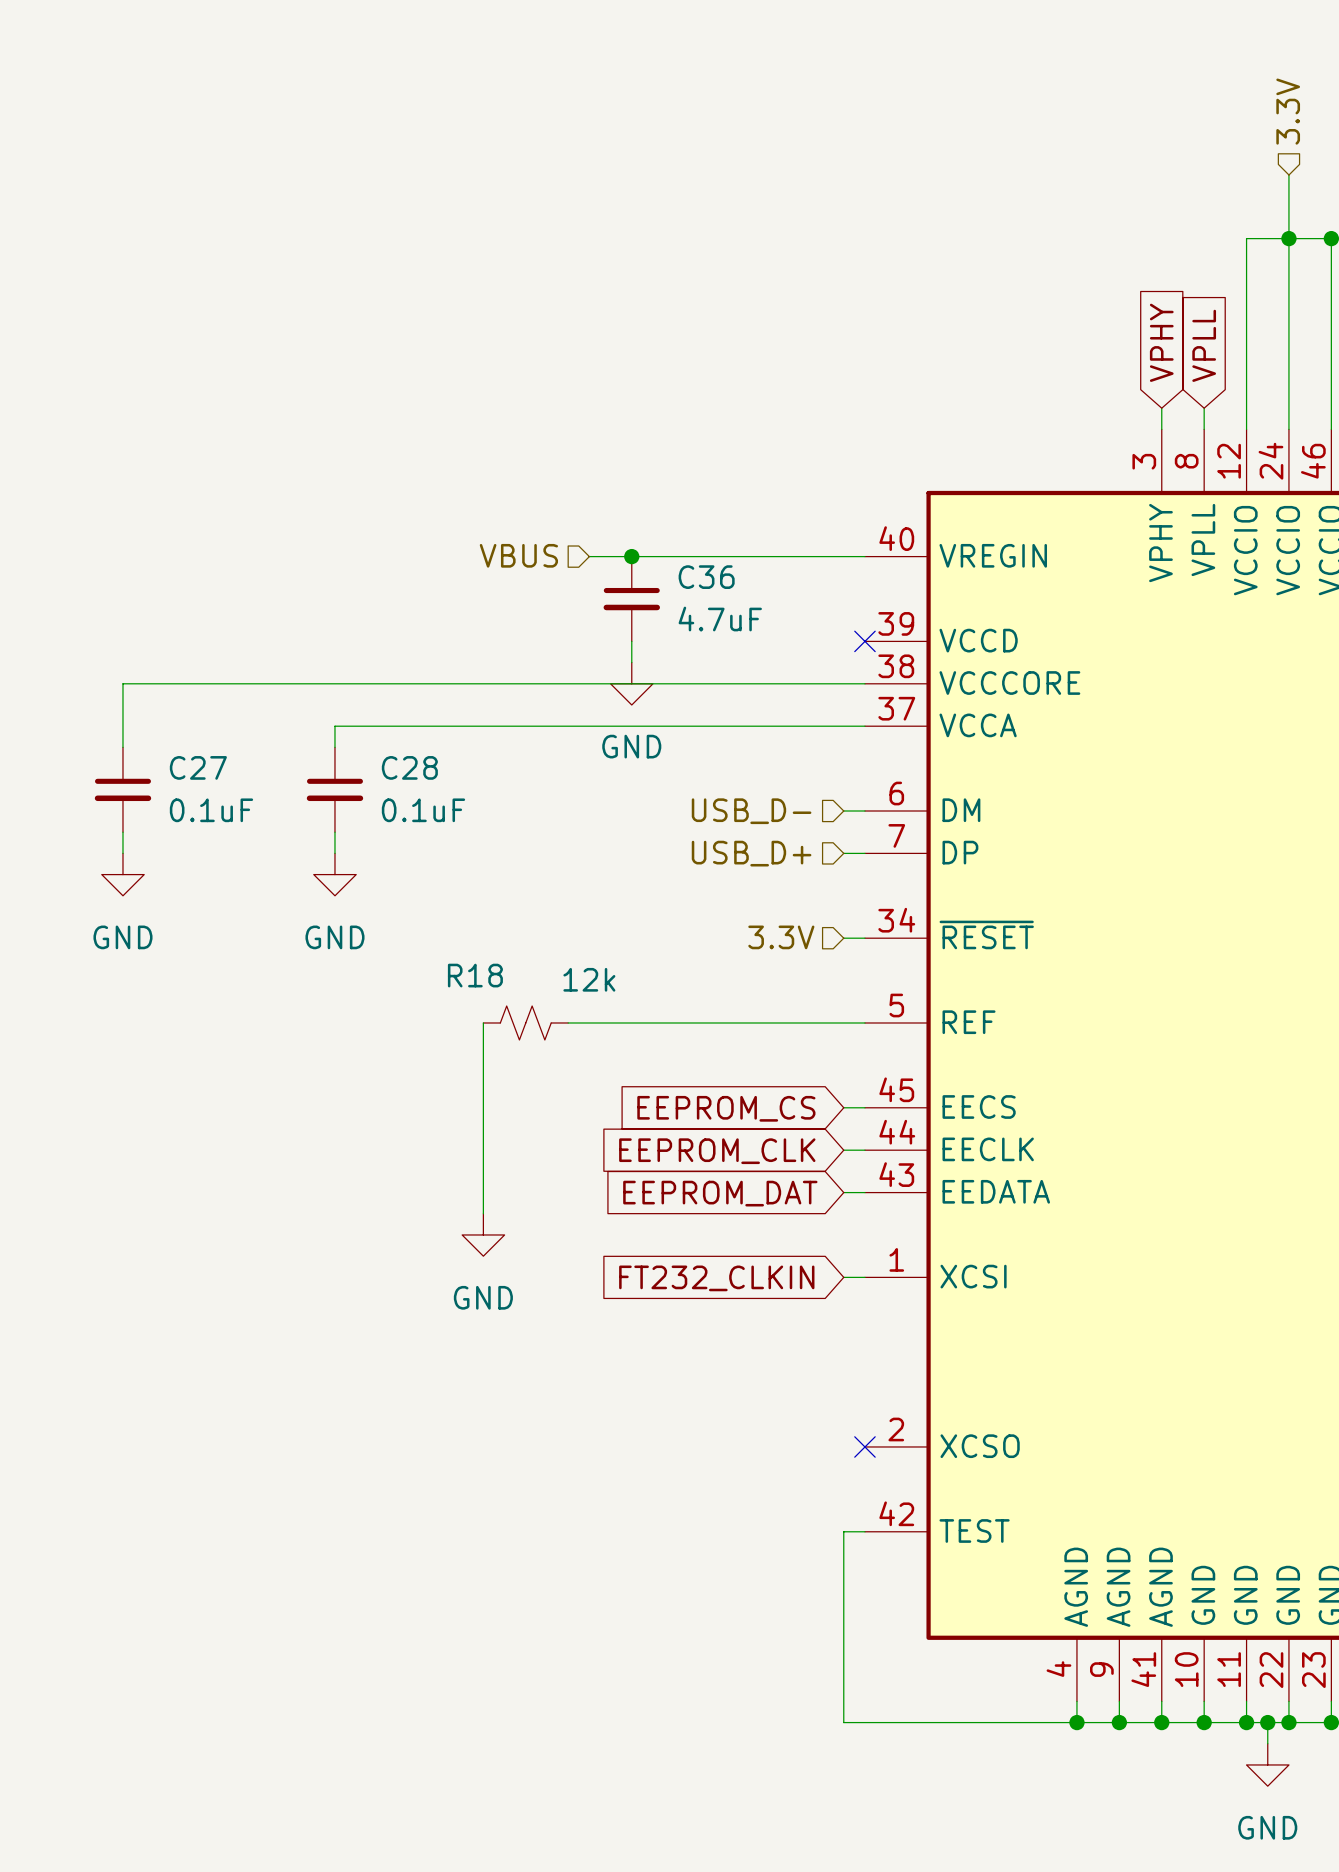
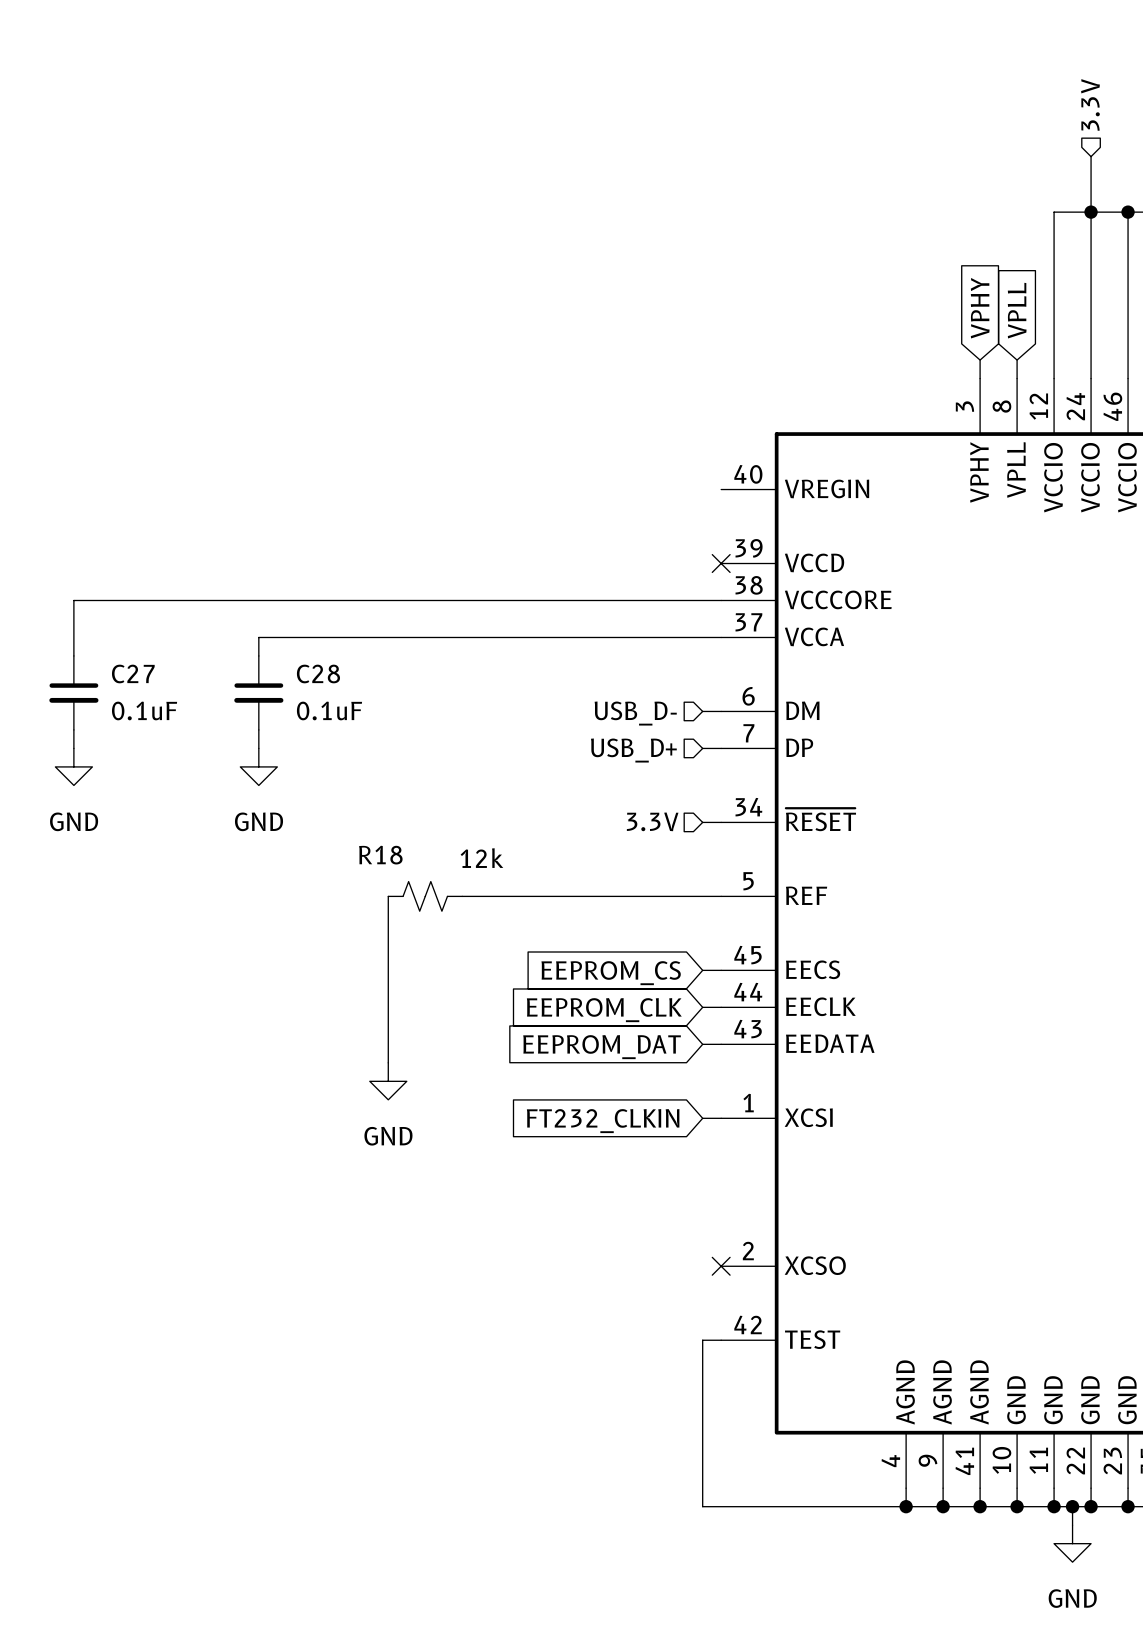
hierarchical label: VBUS (518, 555) -> none
wire: (589, 556) (864, 556) -> none
junction: (631, 556) -> none
C36: 4.7uF (631, 599) -> none
wire: (631, 641) (631, 662) -> none
power symbol: GND (631, 683) -> none

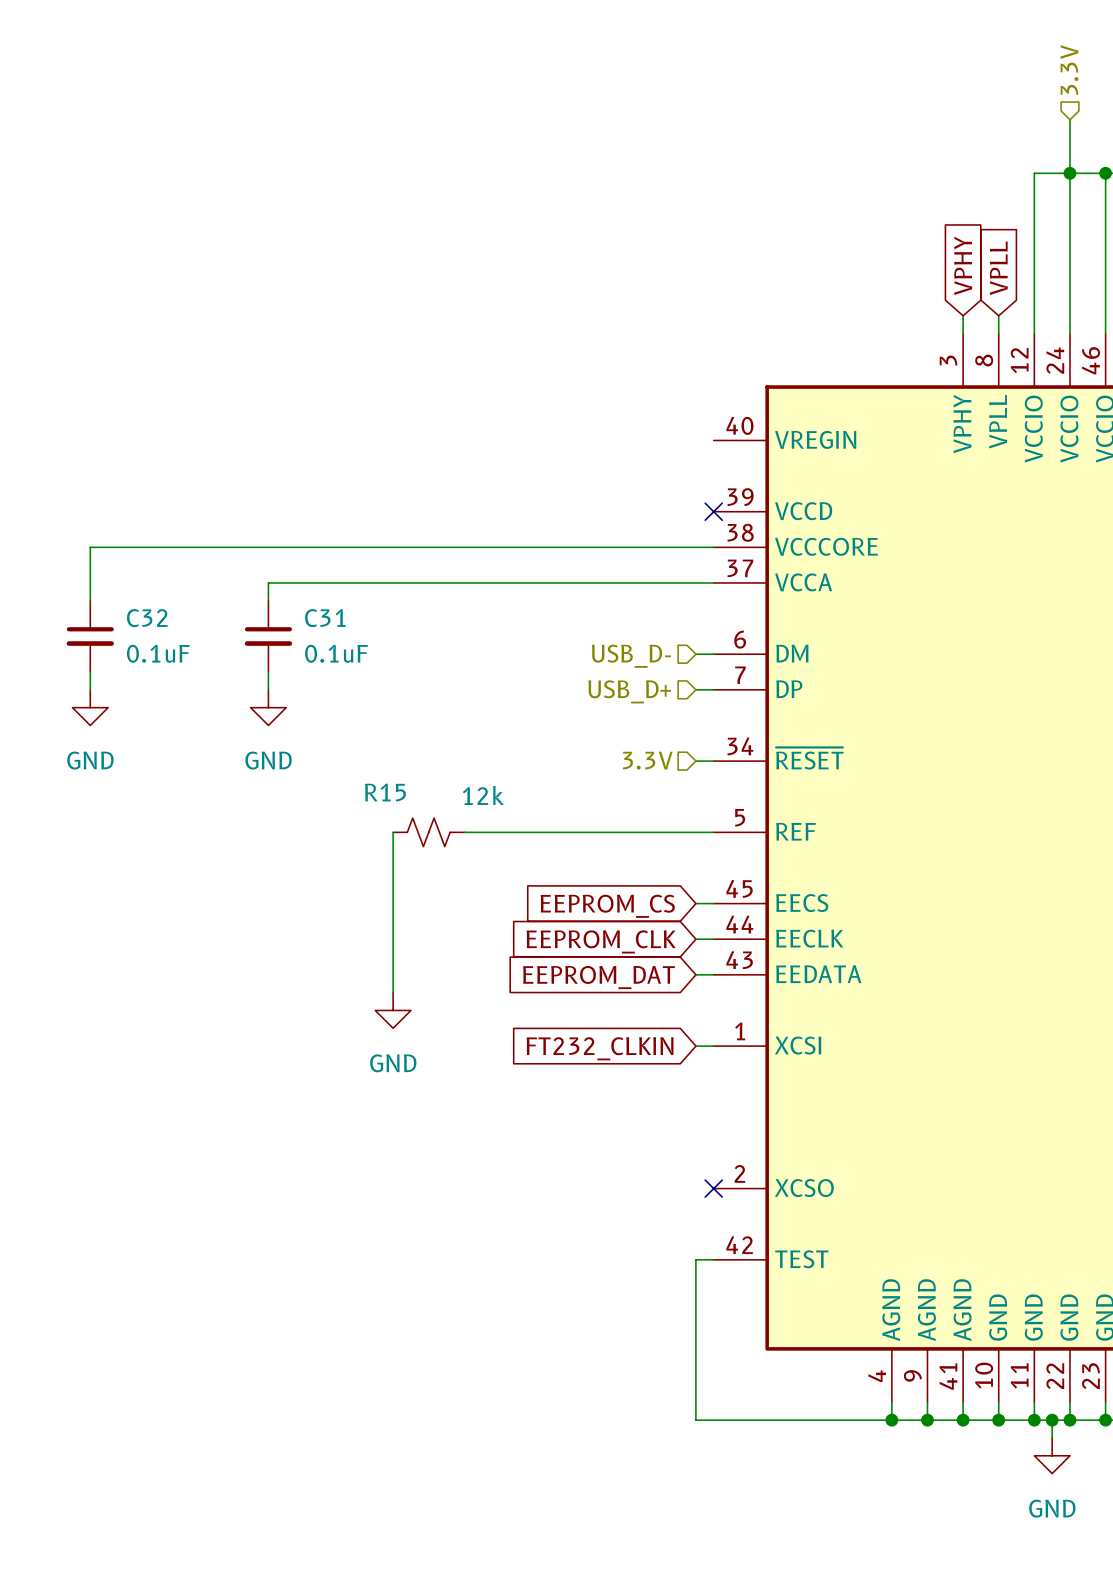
C27 name: C27 (133, 673) -> C32 (147, 618)
C28 name: C28 (318, 673) -> C31 (325, 618)
R18 name: R18 (380, 855) -> R15 (385, 792)

